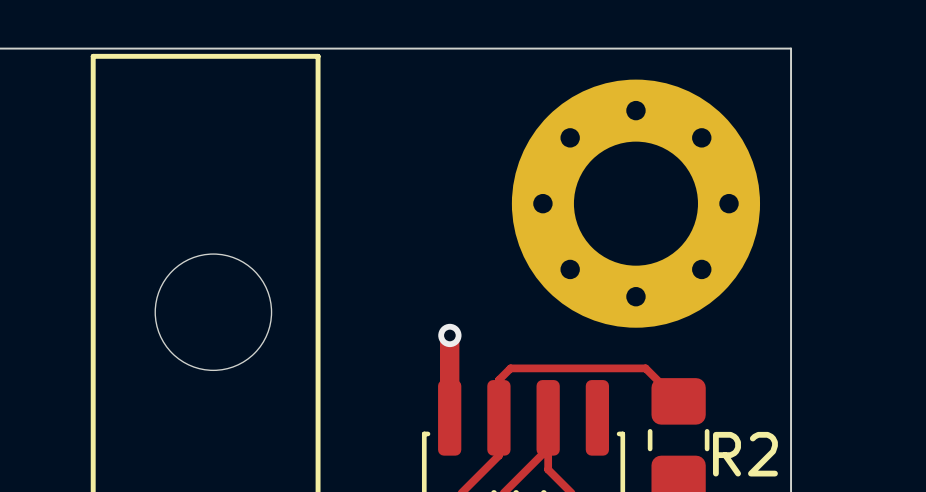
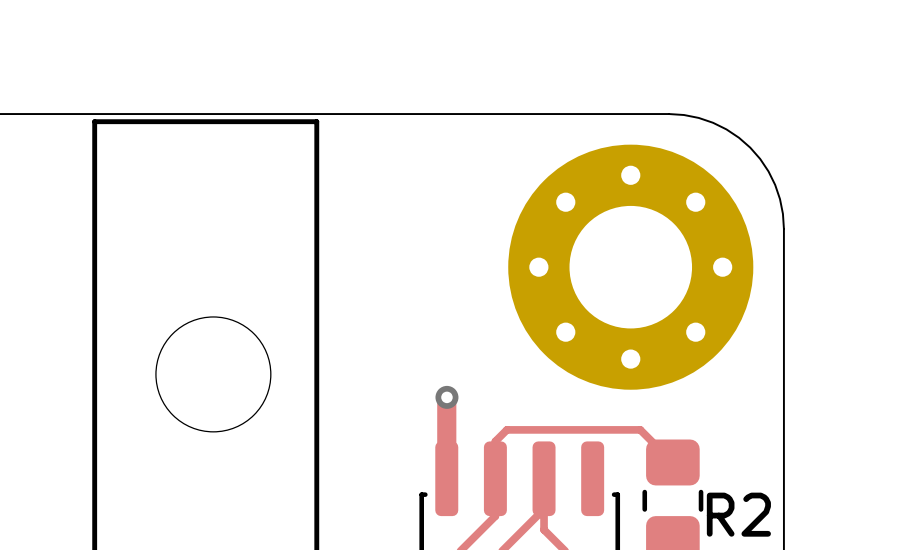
board edge: (674, 48) (791, 48) (791, 164) -> (669, 114) (684, 115) (713, 122) (738, 137) (750, 147) (760, 158) (775, 184) (780, 199) (783, 228)

